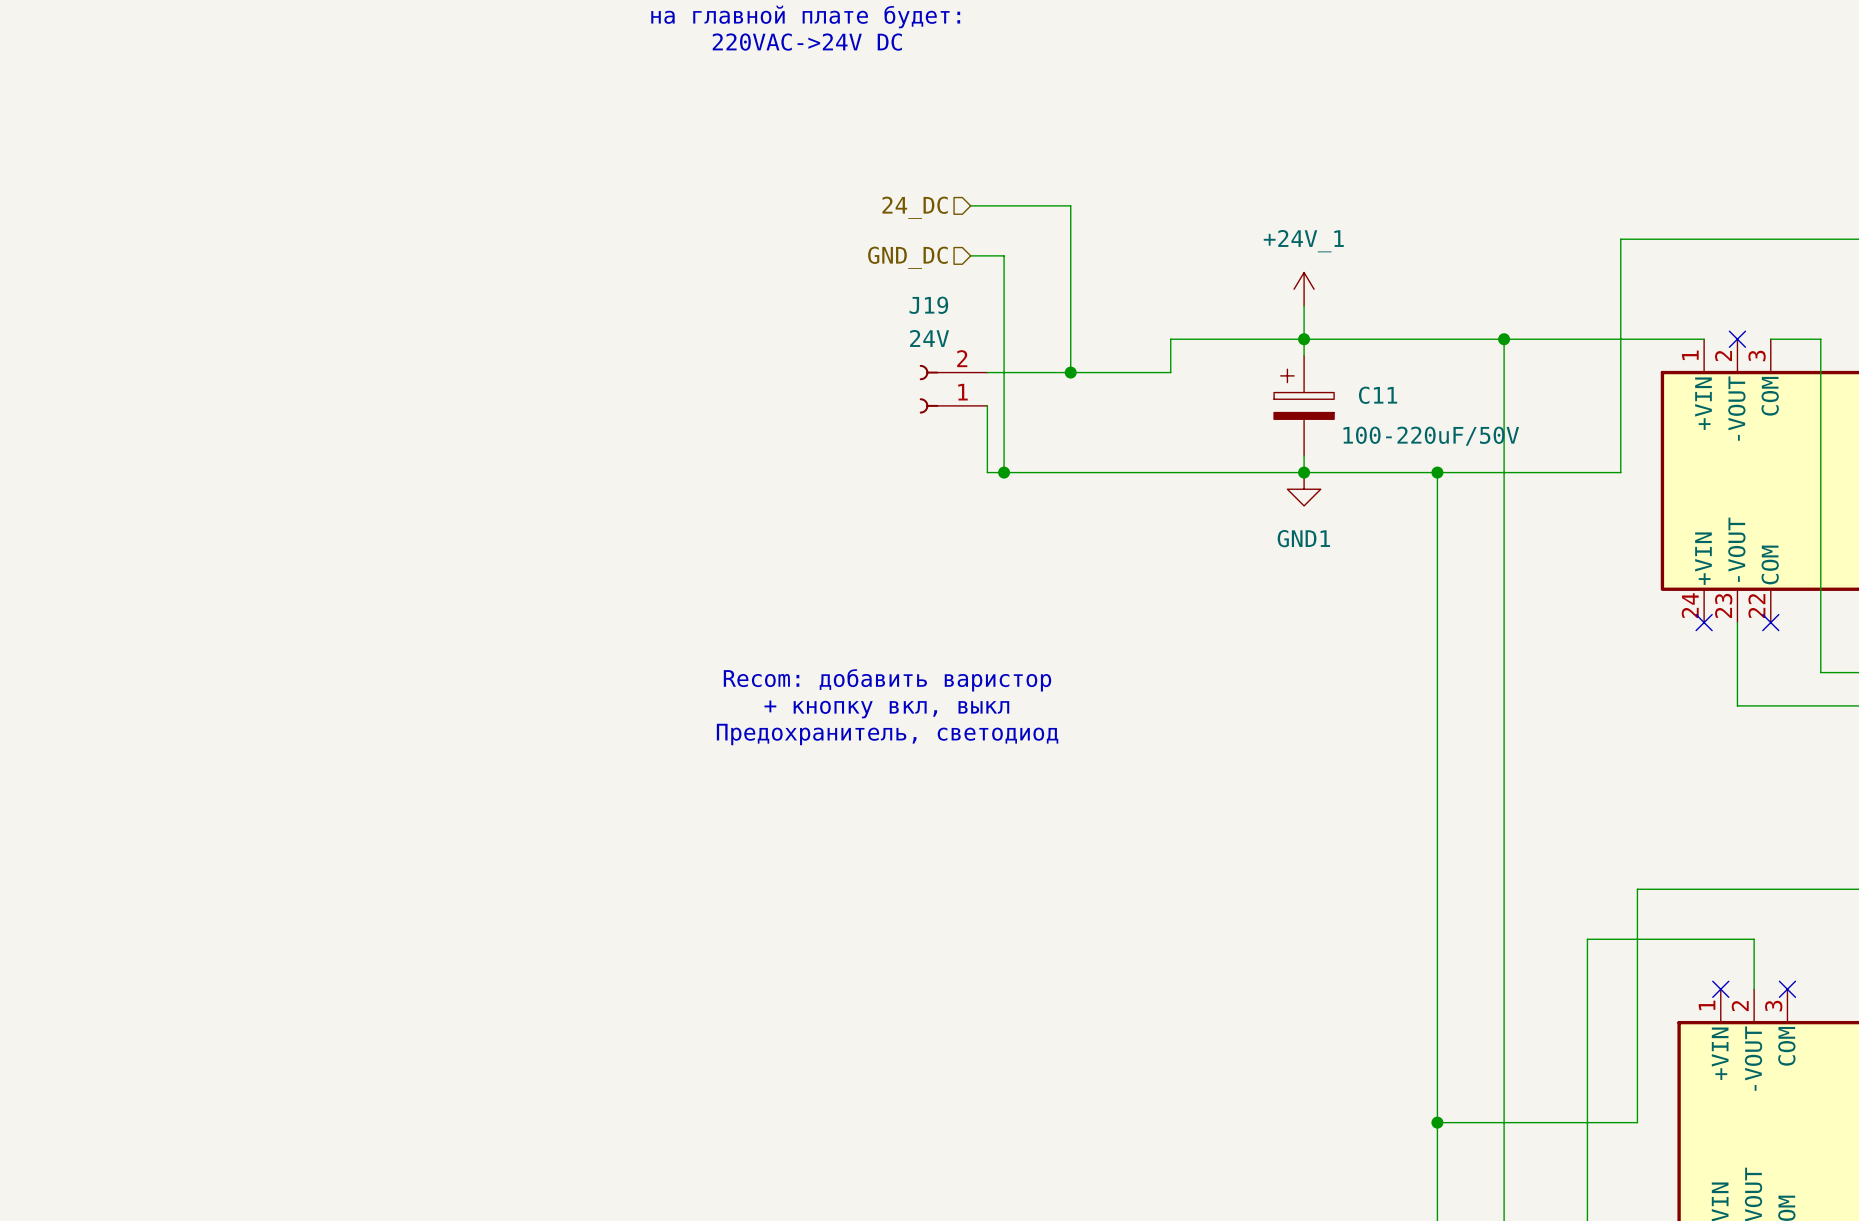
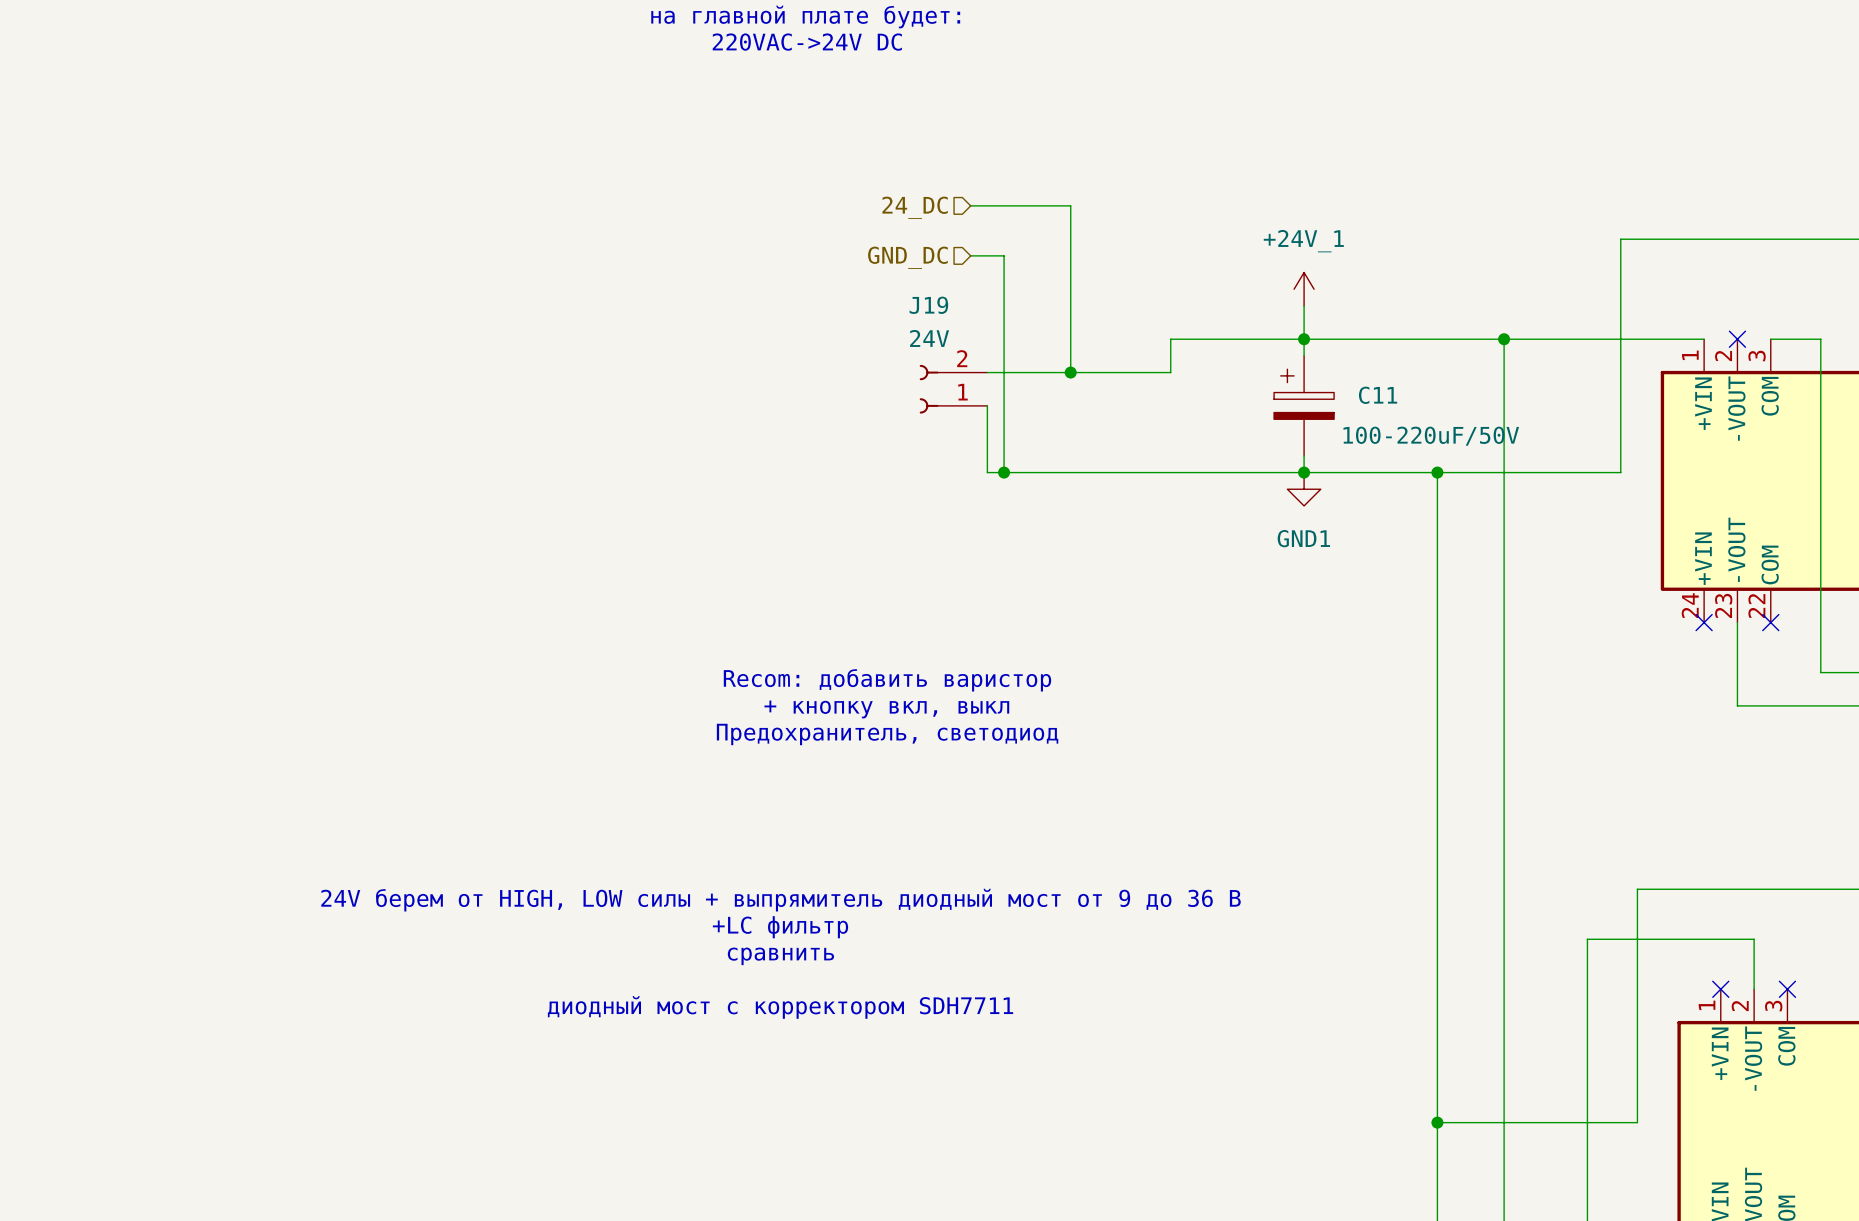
text: none -> 24V берем от HIGH, LOW силы + выпрямитель диодный мост от 9 до 36 В (781, 900)
text: none -> +LC фильтр (780, 927)
text: none -> сравнить (780, 956)
text: none -> диодный мост с корректором SDH7711 (780, 1007)

